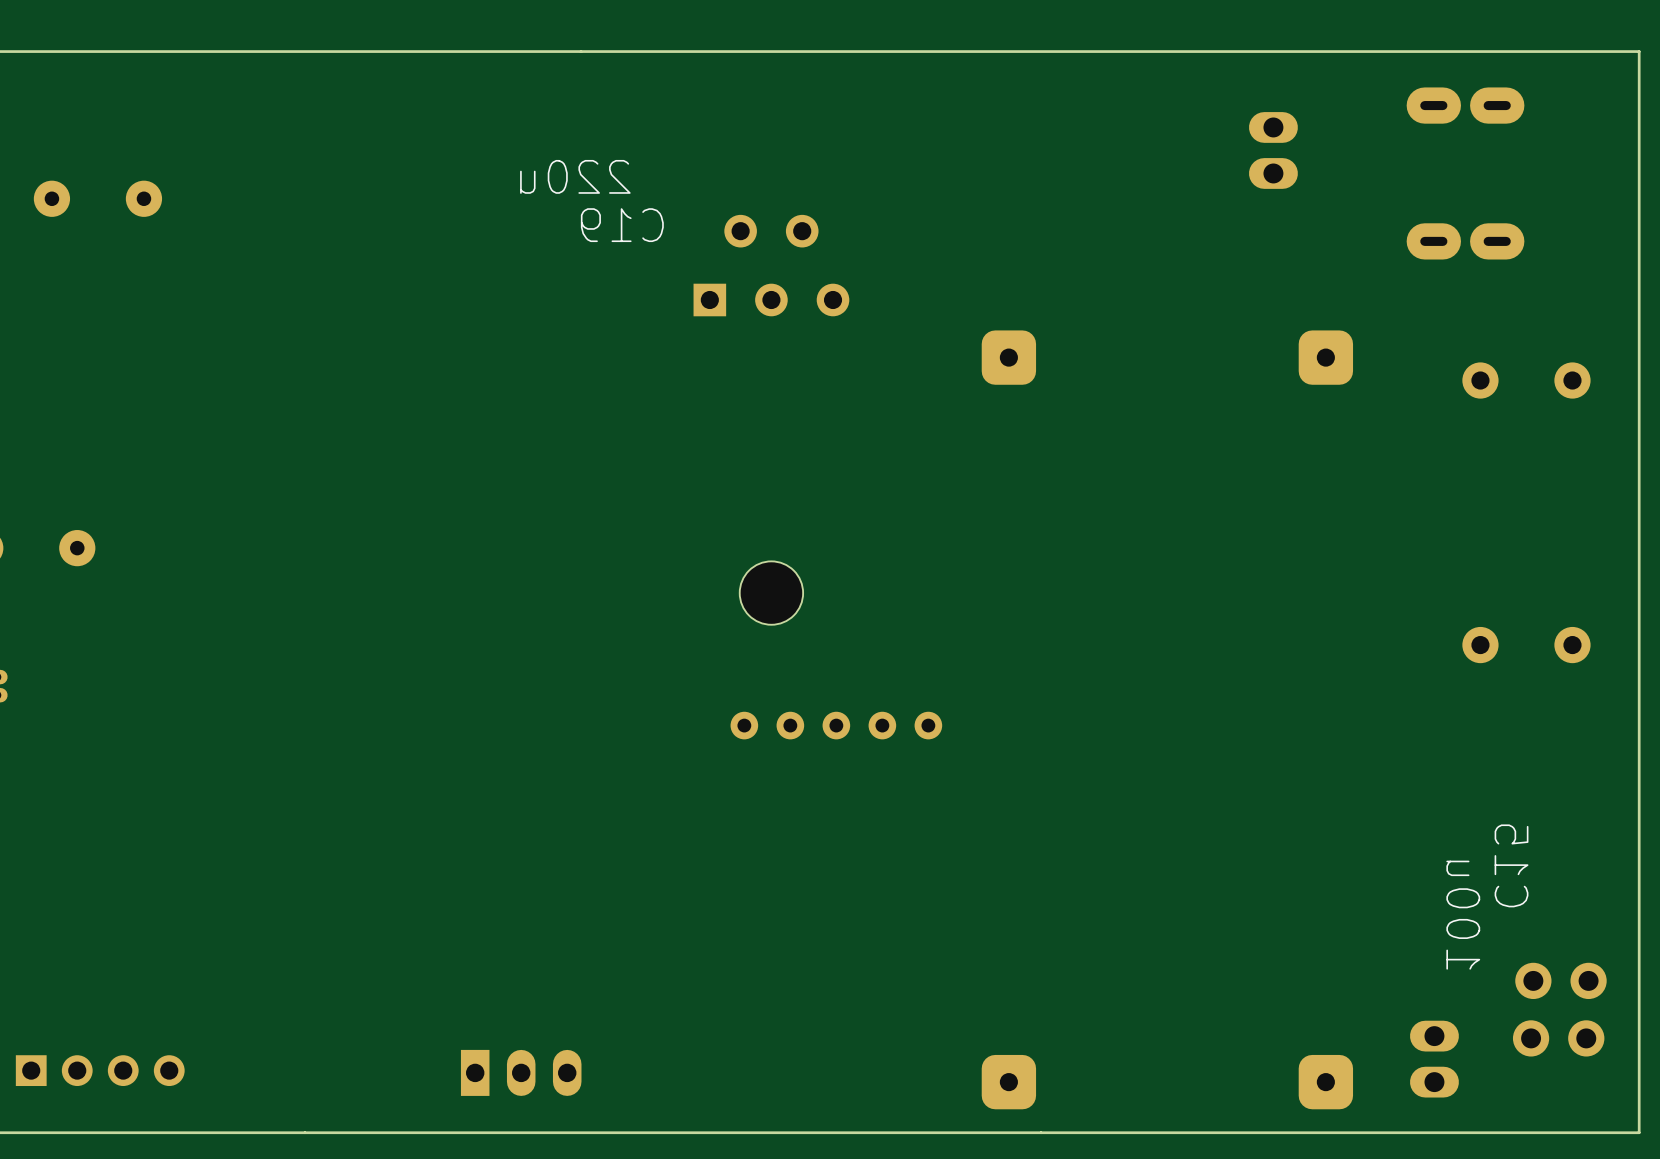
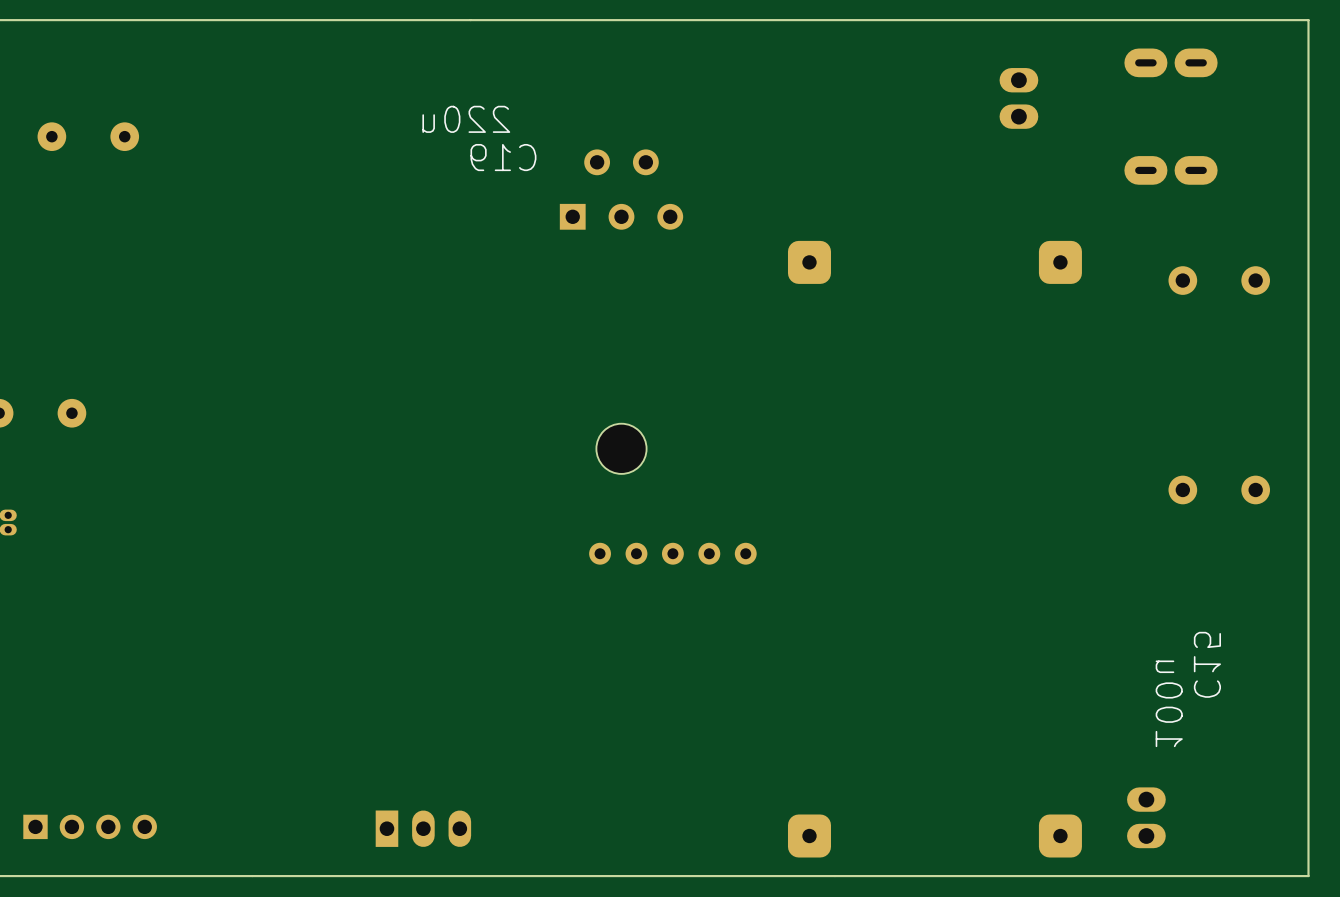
part: (1560, 980) -> none
part: (1558, 1038) -> none

